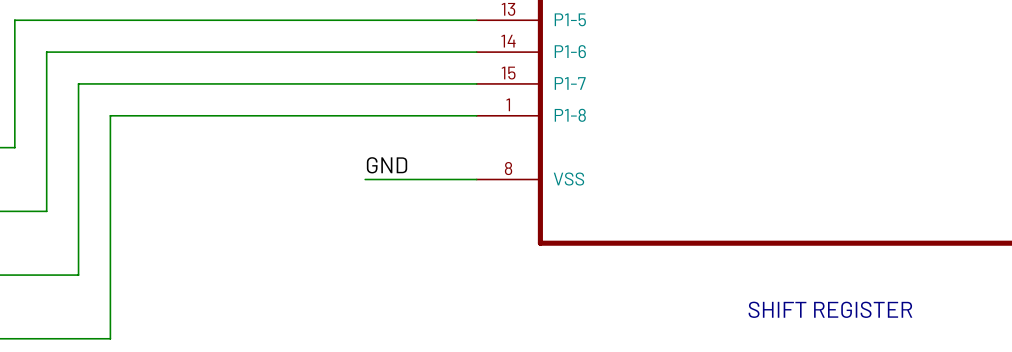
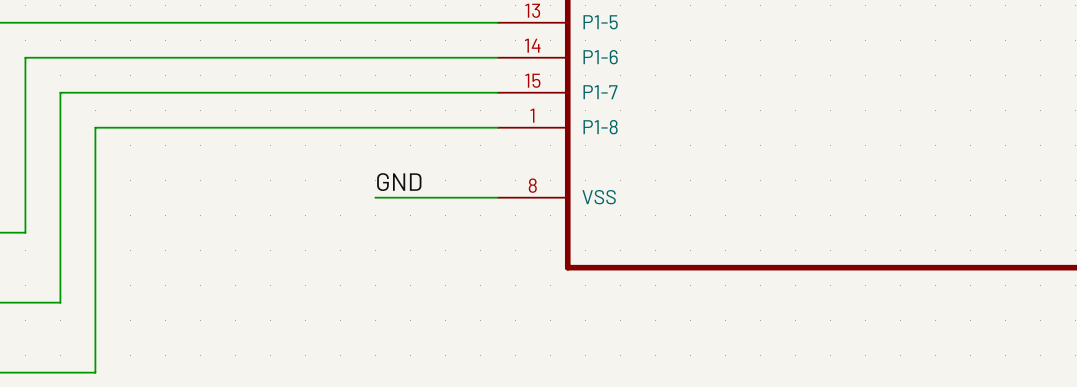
text: SHIFT REGISTER (830, 309) -> none

